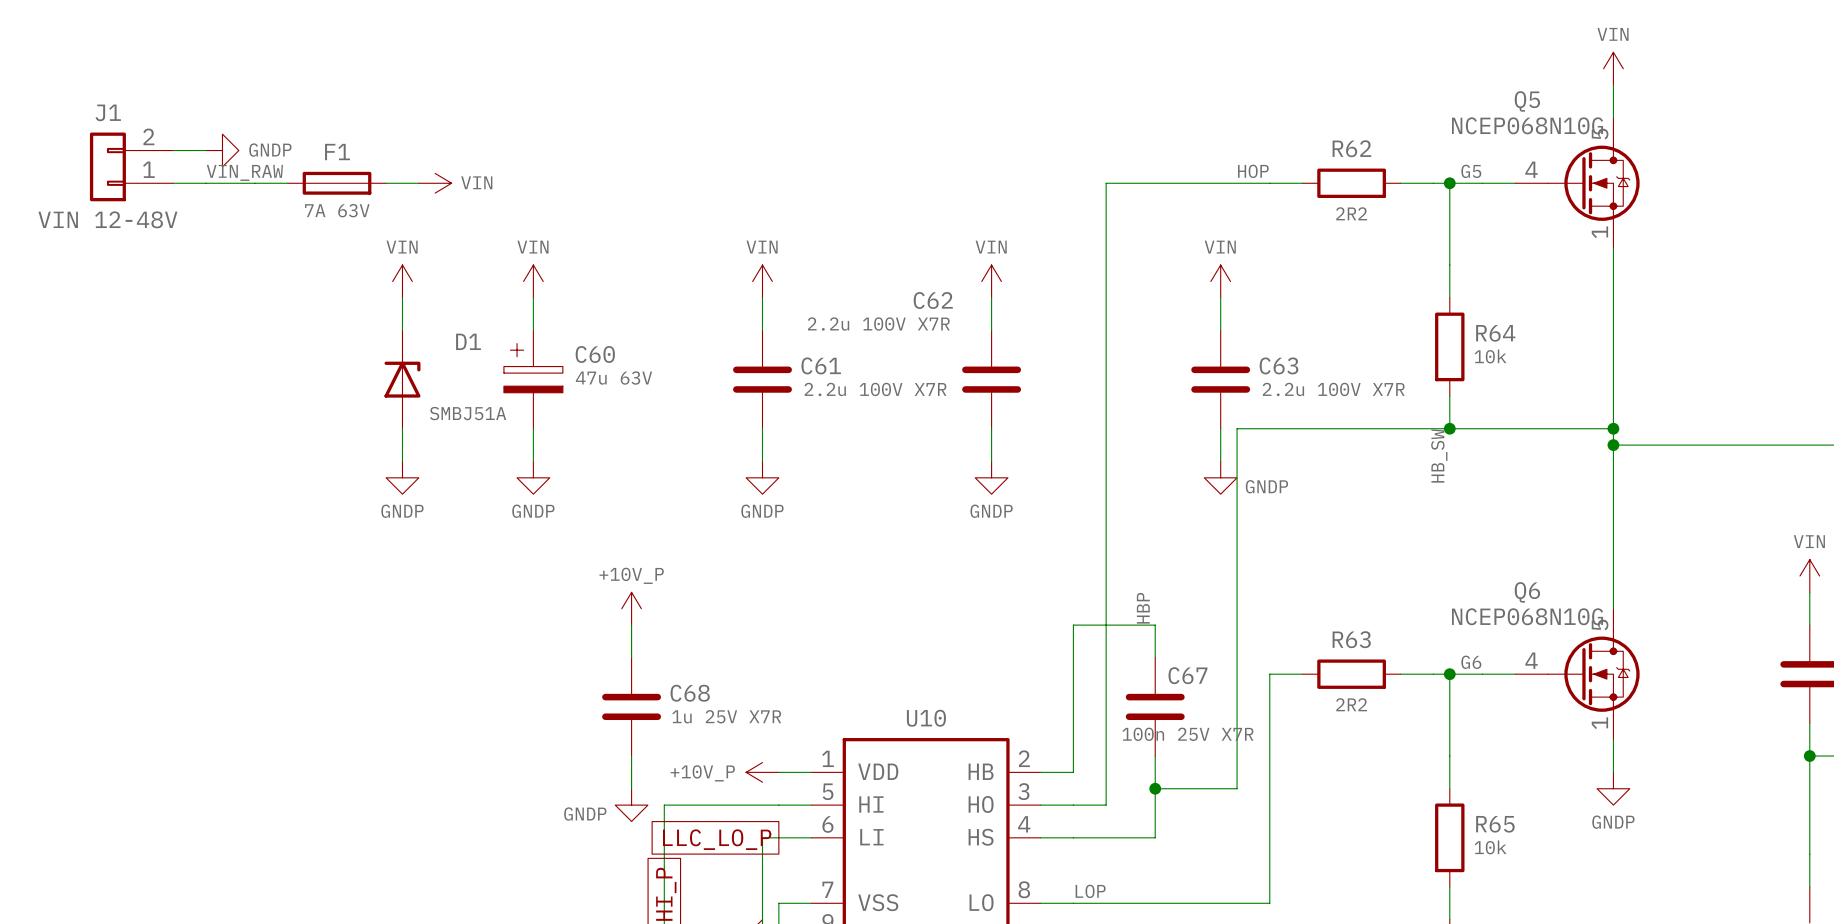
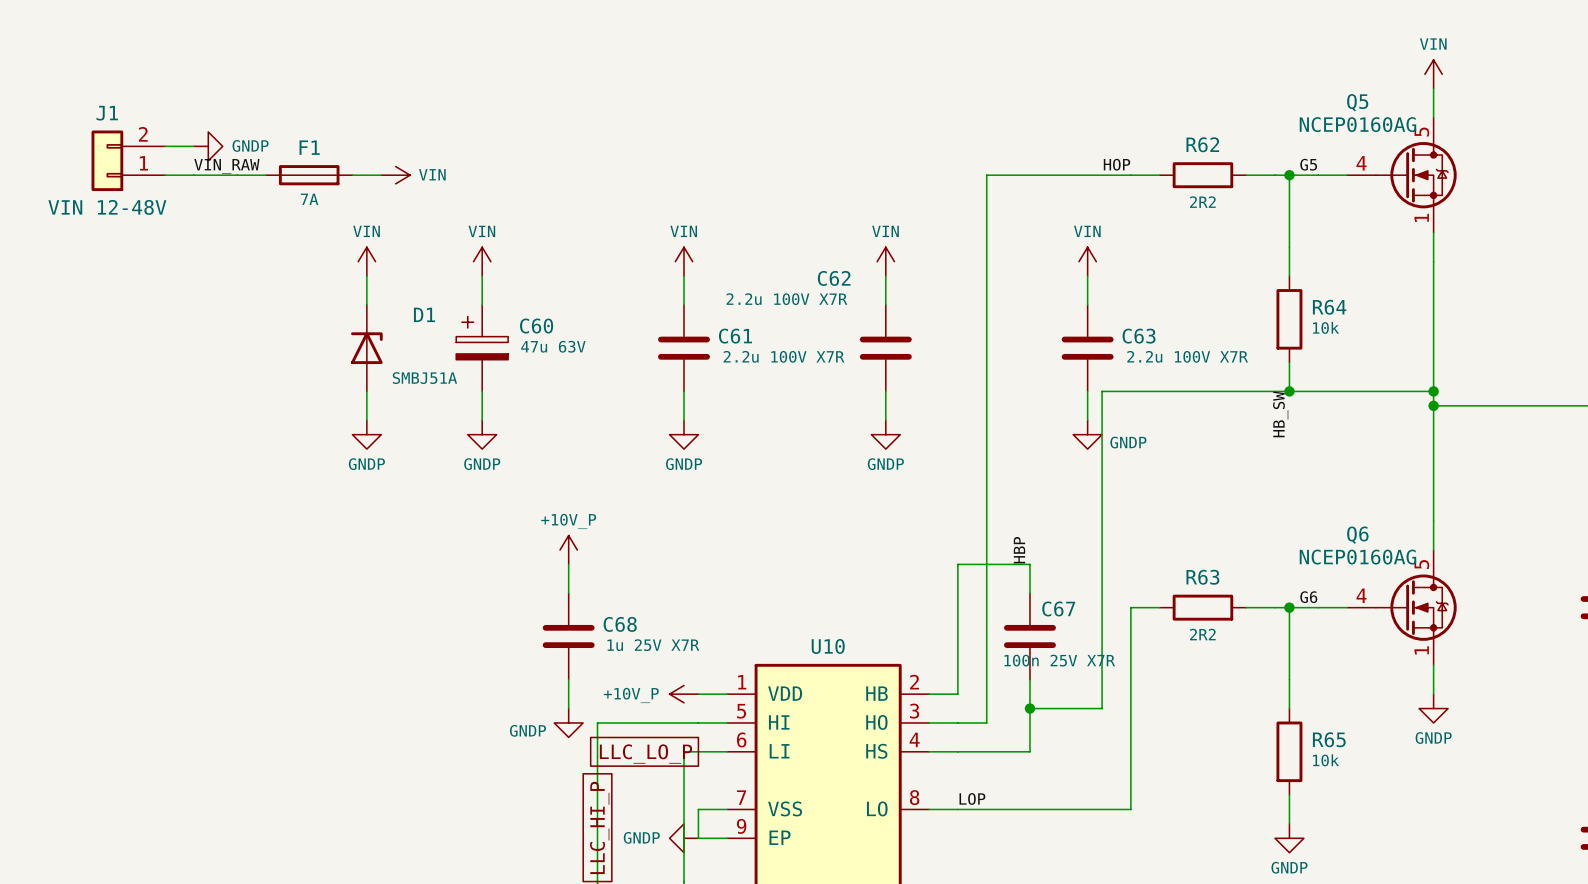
Q5 value: NCEP068N10G (1527, 125) -> NCEP0160AG (1357, 124)
F1 value: 7A 63V (337, 210) -> 7A (309, 199)
Q6 value: NCEP068N10G (1527, 616) -> NCEP0160AG (1357, 557)

